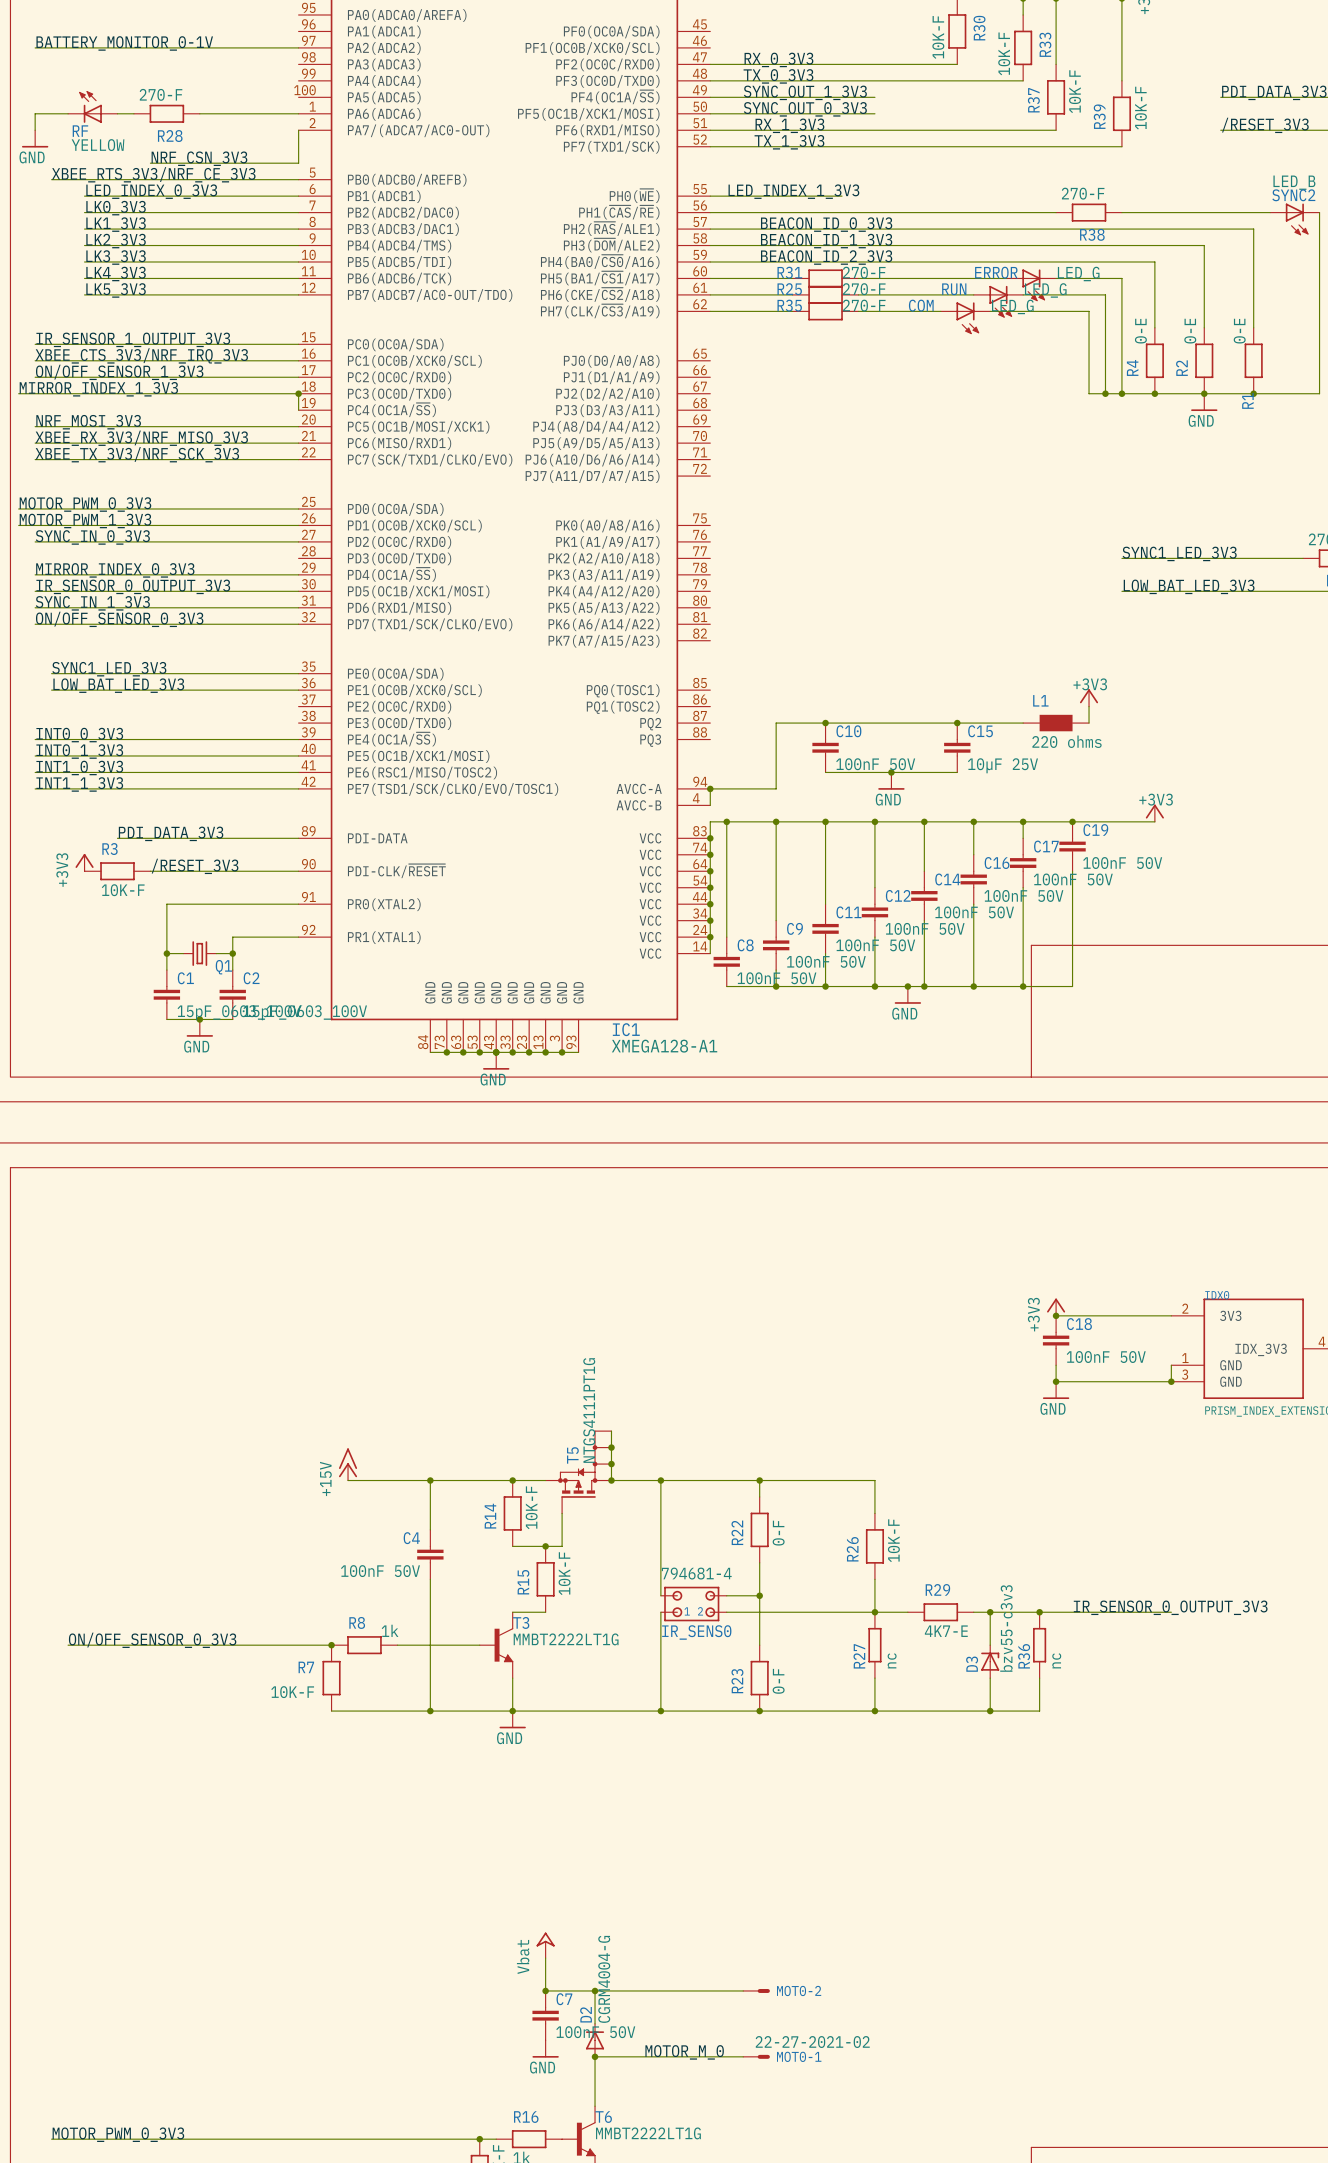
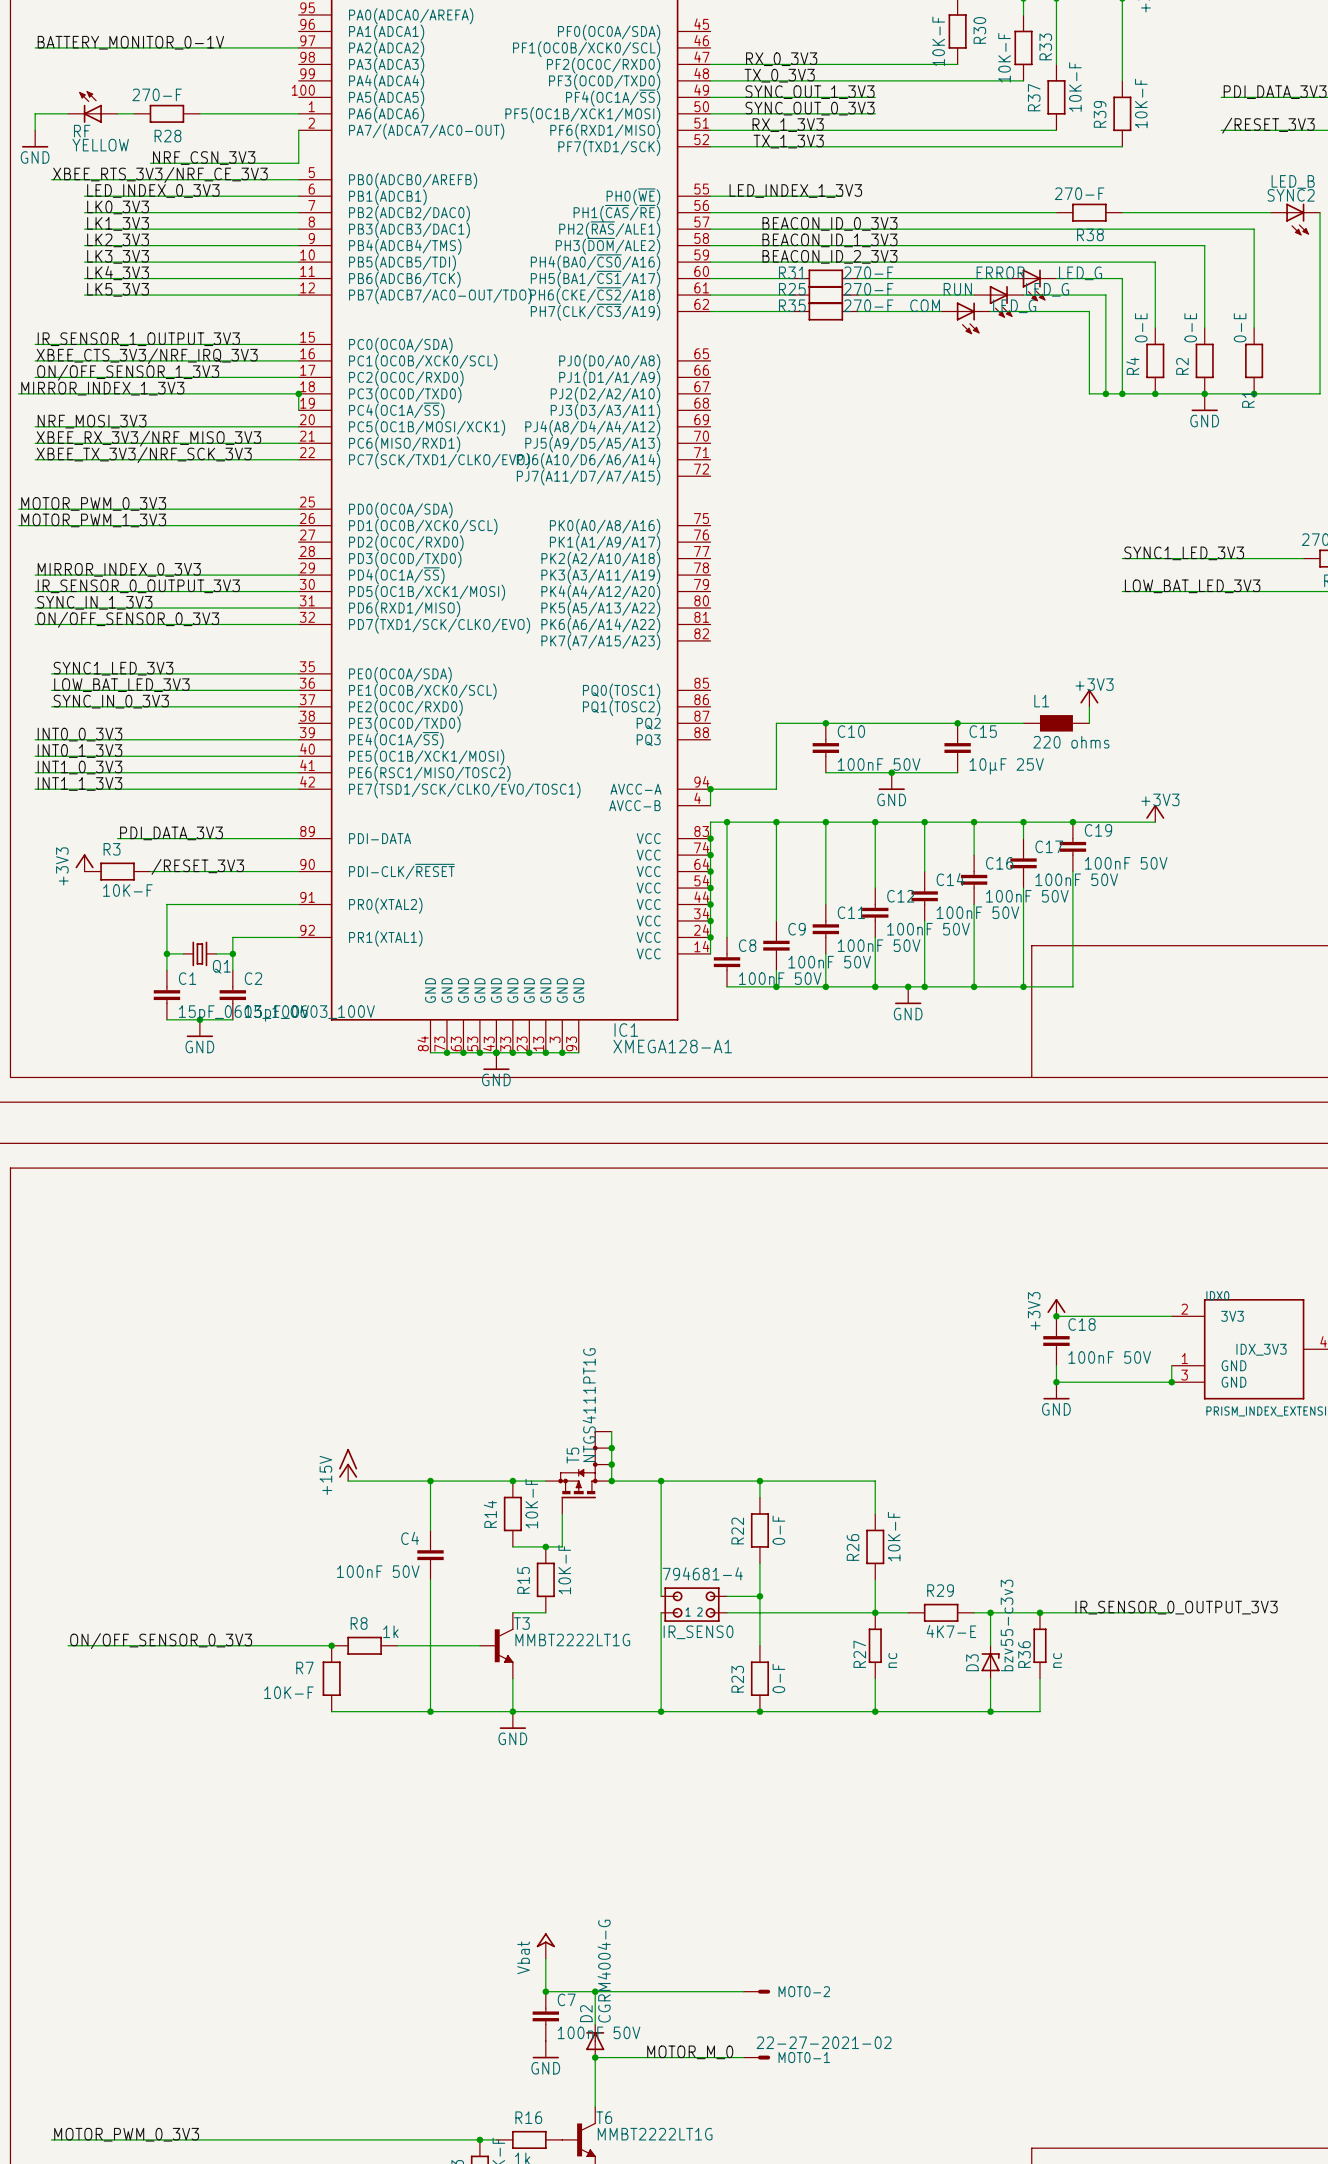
label: SYNC_IN_0_3V3 (92, 537) -> none
wire: (35, 541) (298, 541) -> none
label: none -> SYNC_IN_0_3V3 (111, 701)
wire: none -> (51, 706) (298, 706)

